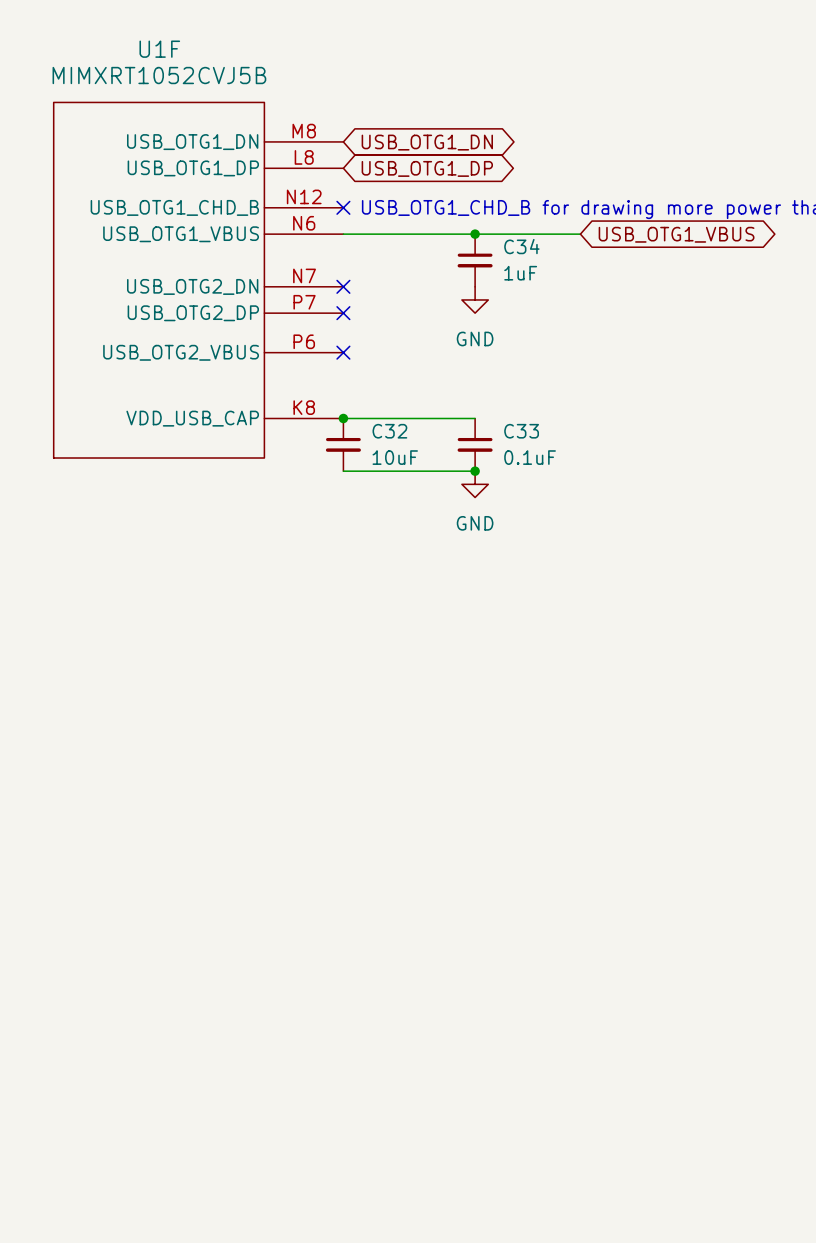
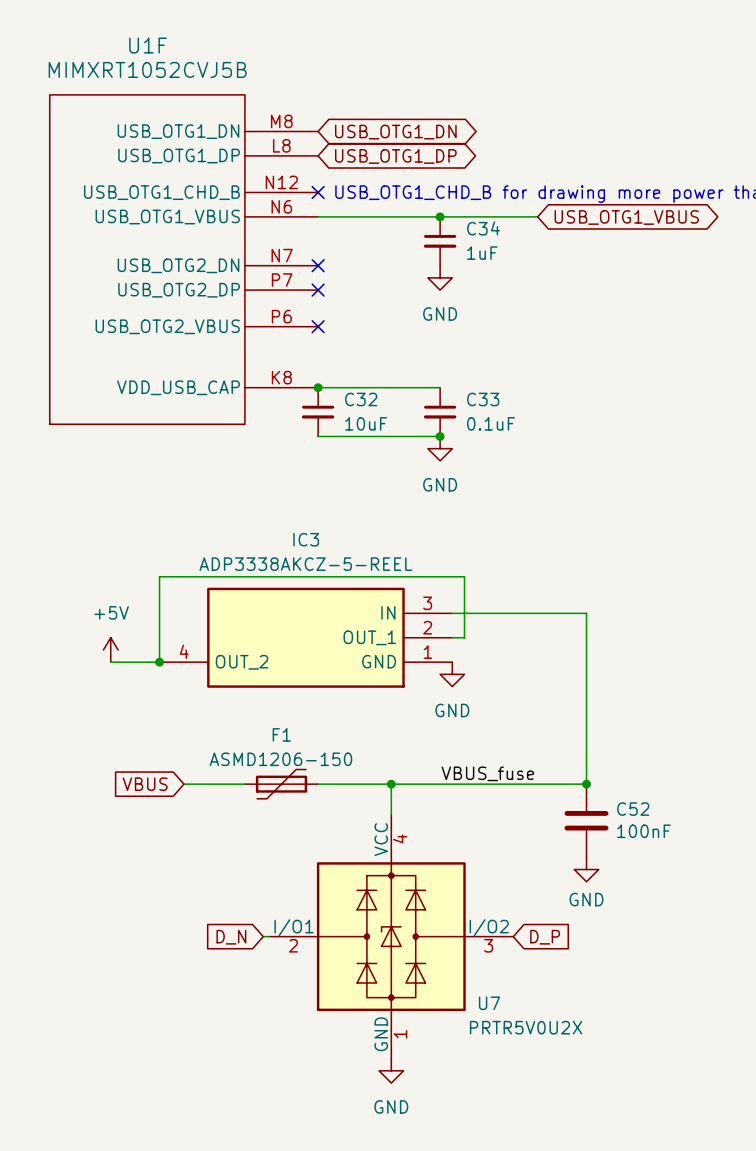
wire: none -> (452, 613) (586, 613) (586, 784) (318, 784)
IC3: none -> ADP3338AKCZ-5-REEL (305, 637)
wire: none -> (452, 637) (464, 637) (464, 576) (159, 576) (159, 662) (110, 662)
power symbol: none -> +5V (110, 649)
junction: none -> (159, 662)
power symbol: none -> GND (452, 674)
label: none -> VBUS_fuse (487, 773)
global label: none -> VBUS (145, 784)
wire: none -> (183, 784) (244, 784)
F1: none -> ASMD1206-150 (281, 784)
wire: none -> (391, 784) (391, 814)
junction: none -> (391, 784)
junction: none -> (586, 784)
C52: none -> 100nF (586, 820)
power symbol: none -> GND (586, 869)
global label: none -> D_N (231, 937)
wire: none -> (263, 936) (269, 936)
U7: none -> PRTR5V0U2X (391, 936)
global label: none -> D_P (545, 937)
power symbol: none -> GND (391, 1070)

